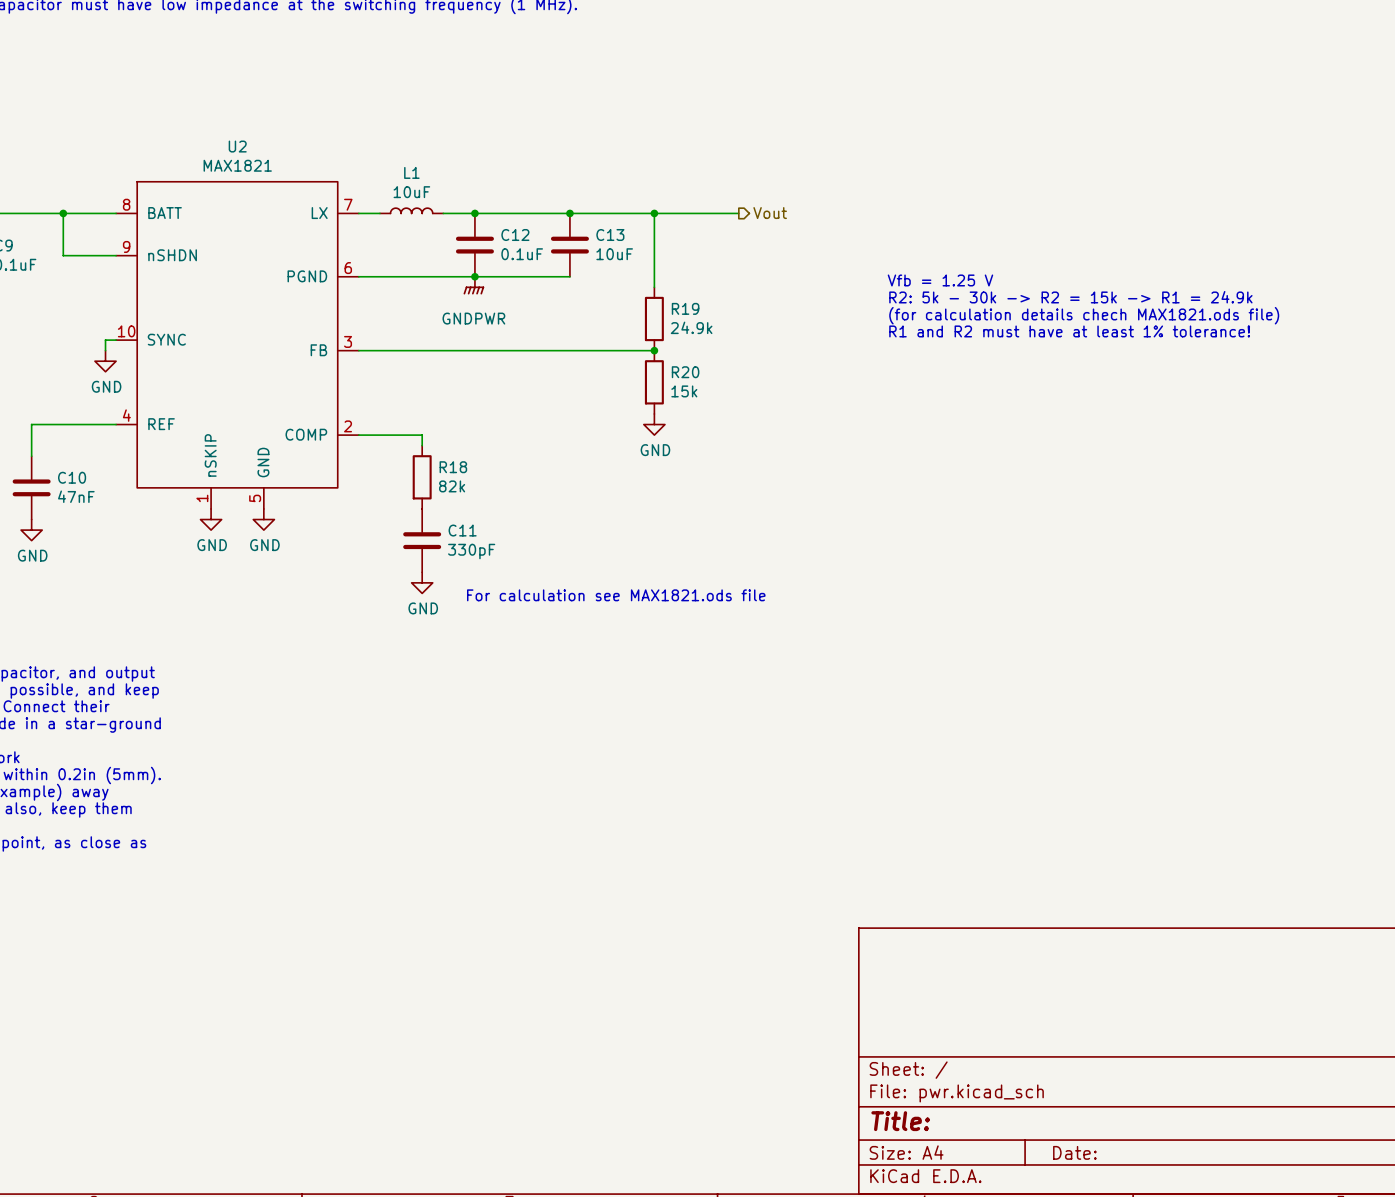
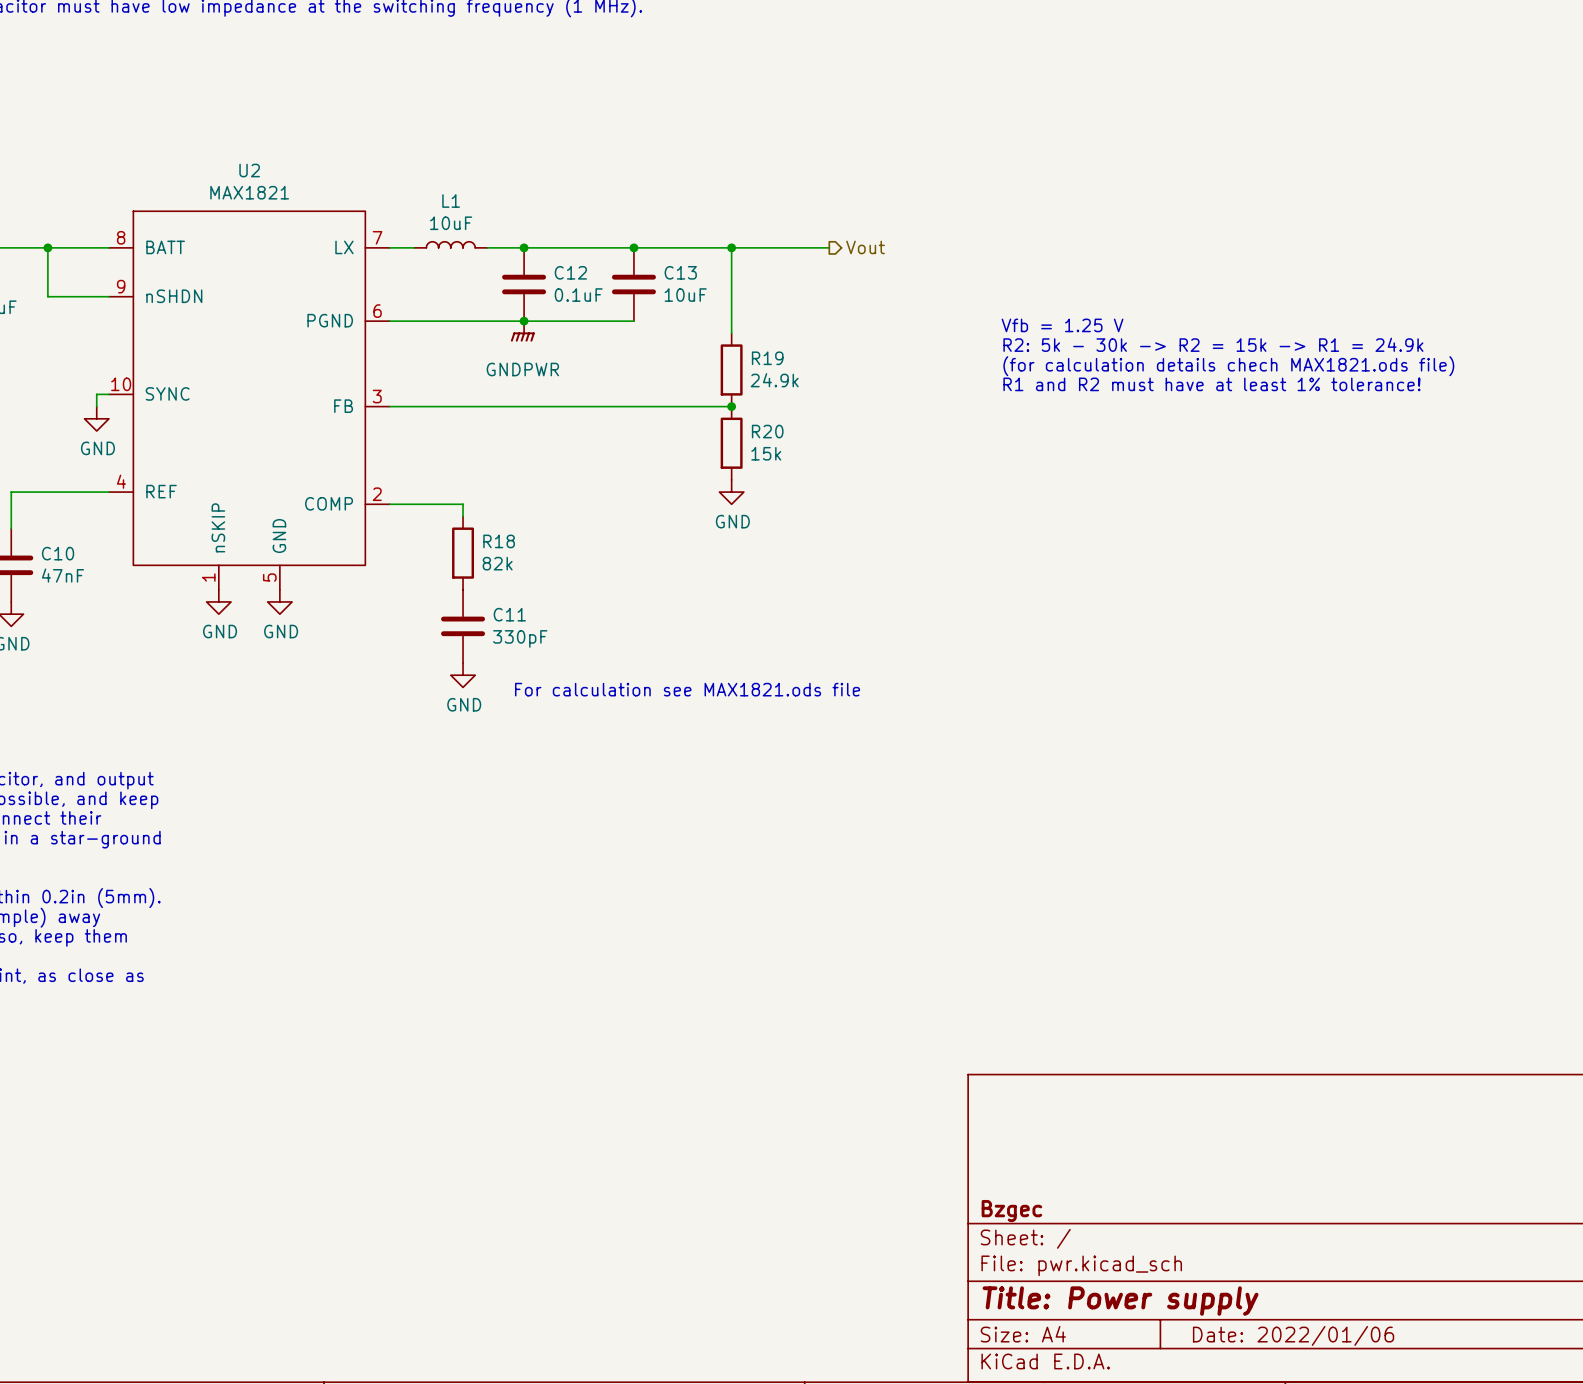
title block: none -> Bzgec (1011, 1211)
title block: Title: (900, 1121) -> Title: Power supply (1120, 1301)
title block: Date: (1074, 1152) -> Date: 2022/01/06 (1293, 1335)

